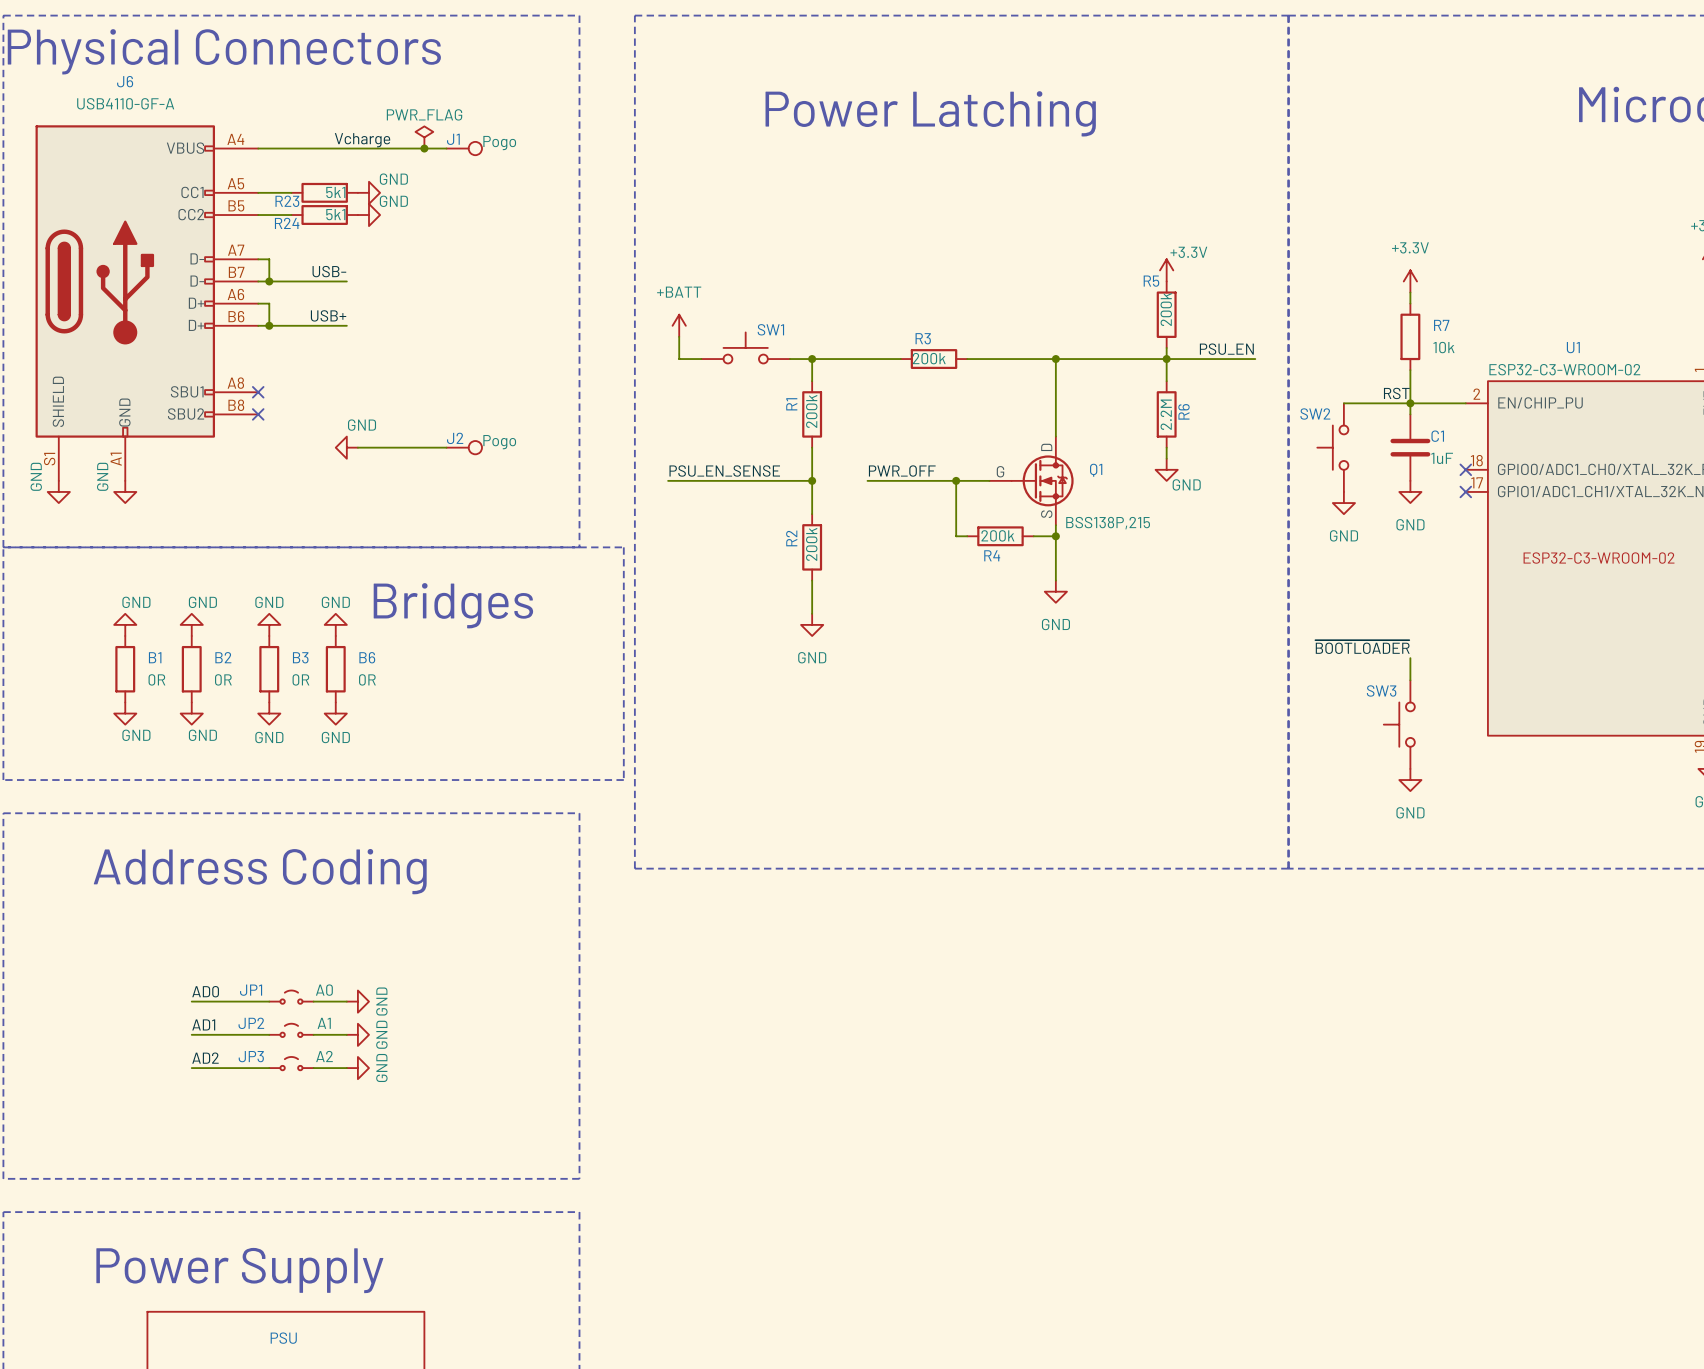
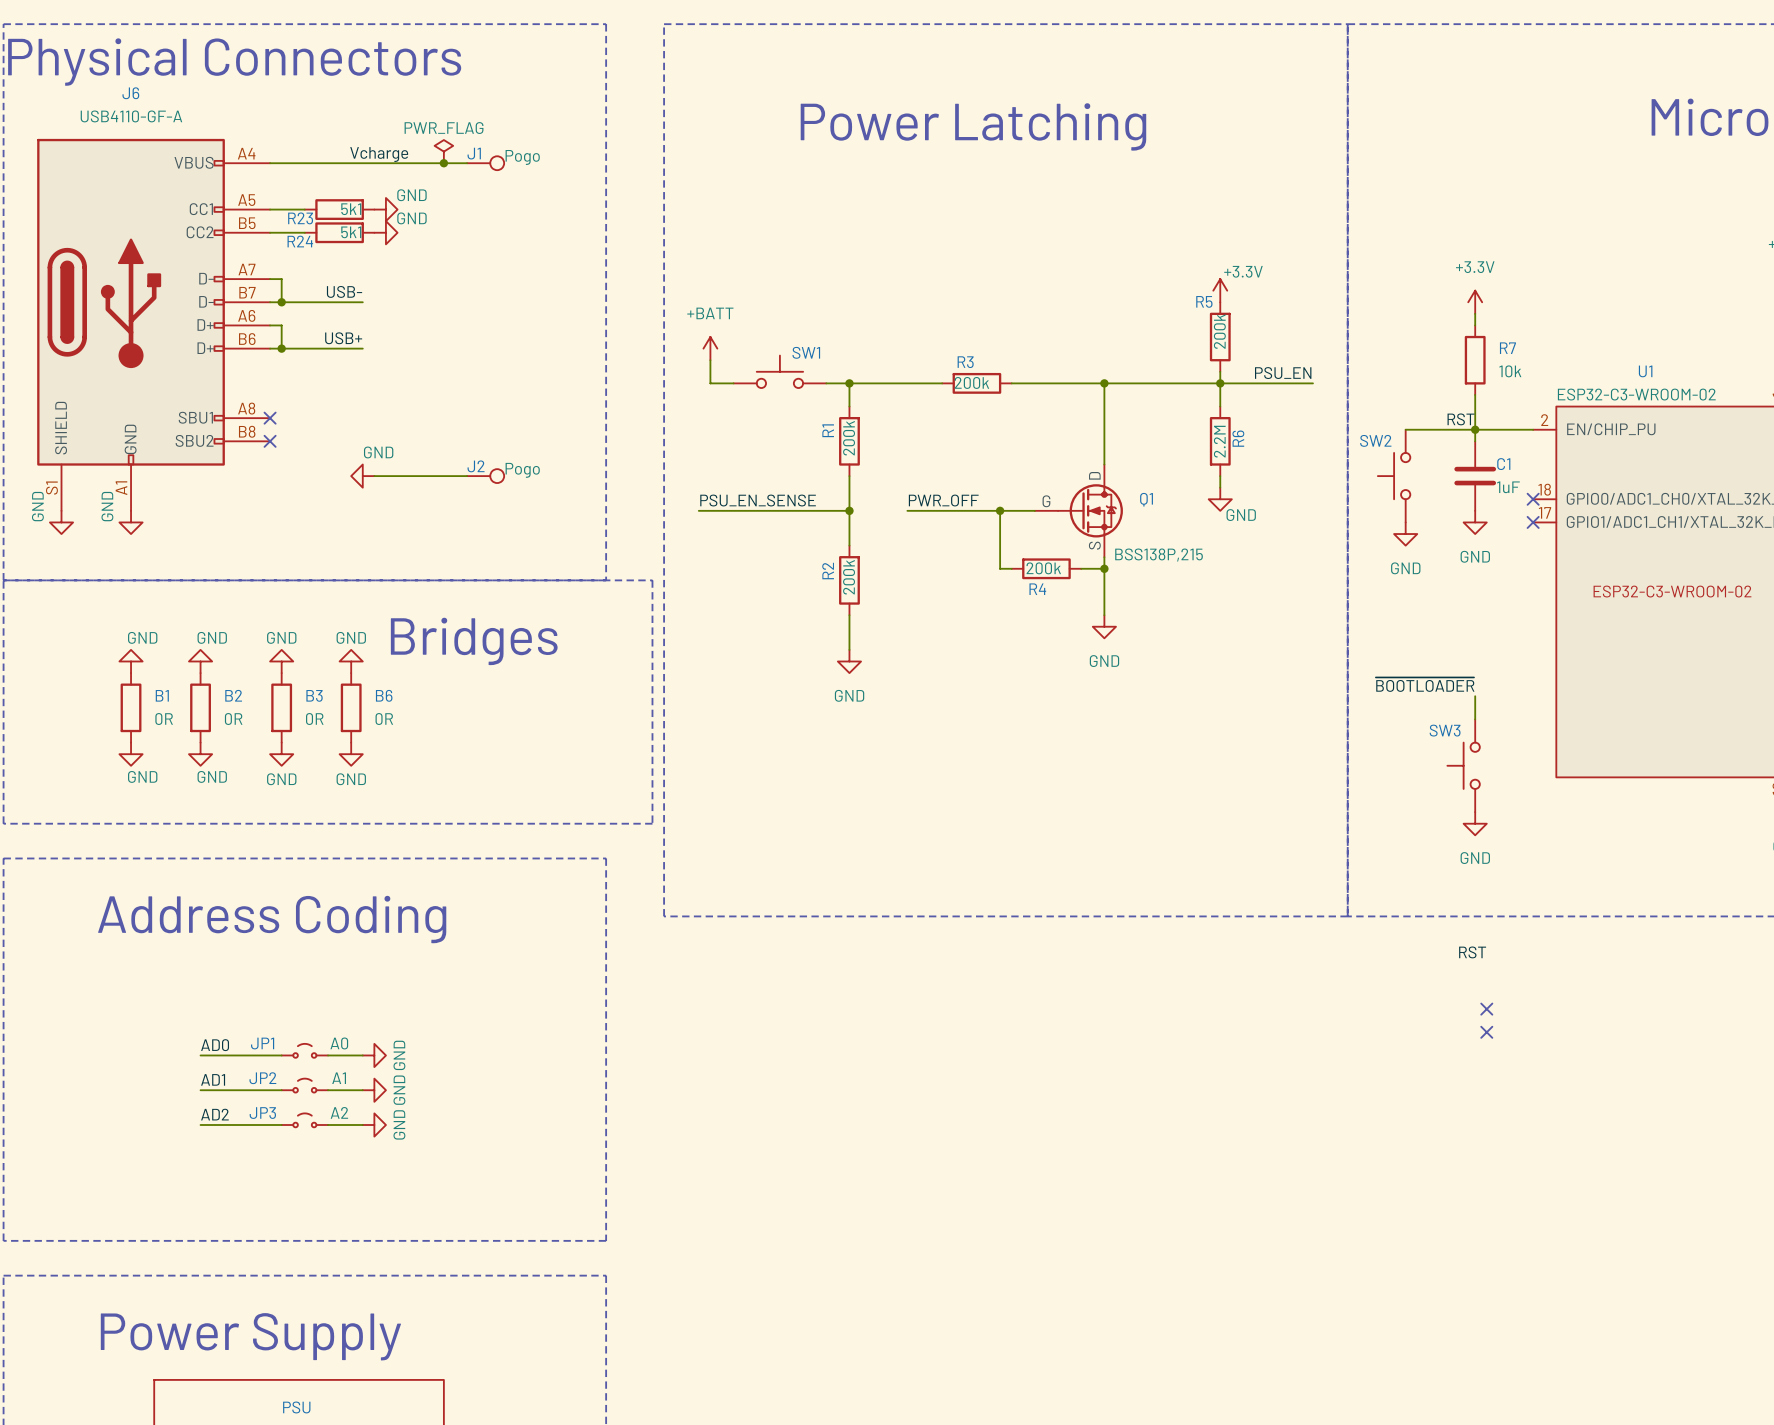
label: none -> RST (1472, 952)
no-connect mark: none -> (1486, 1009)
no-connect mark: none -> (1486, 1032)

